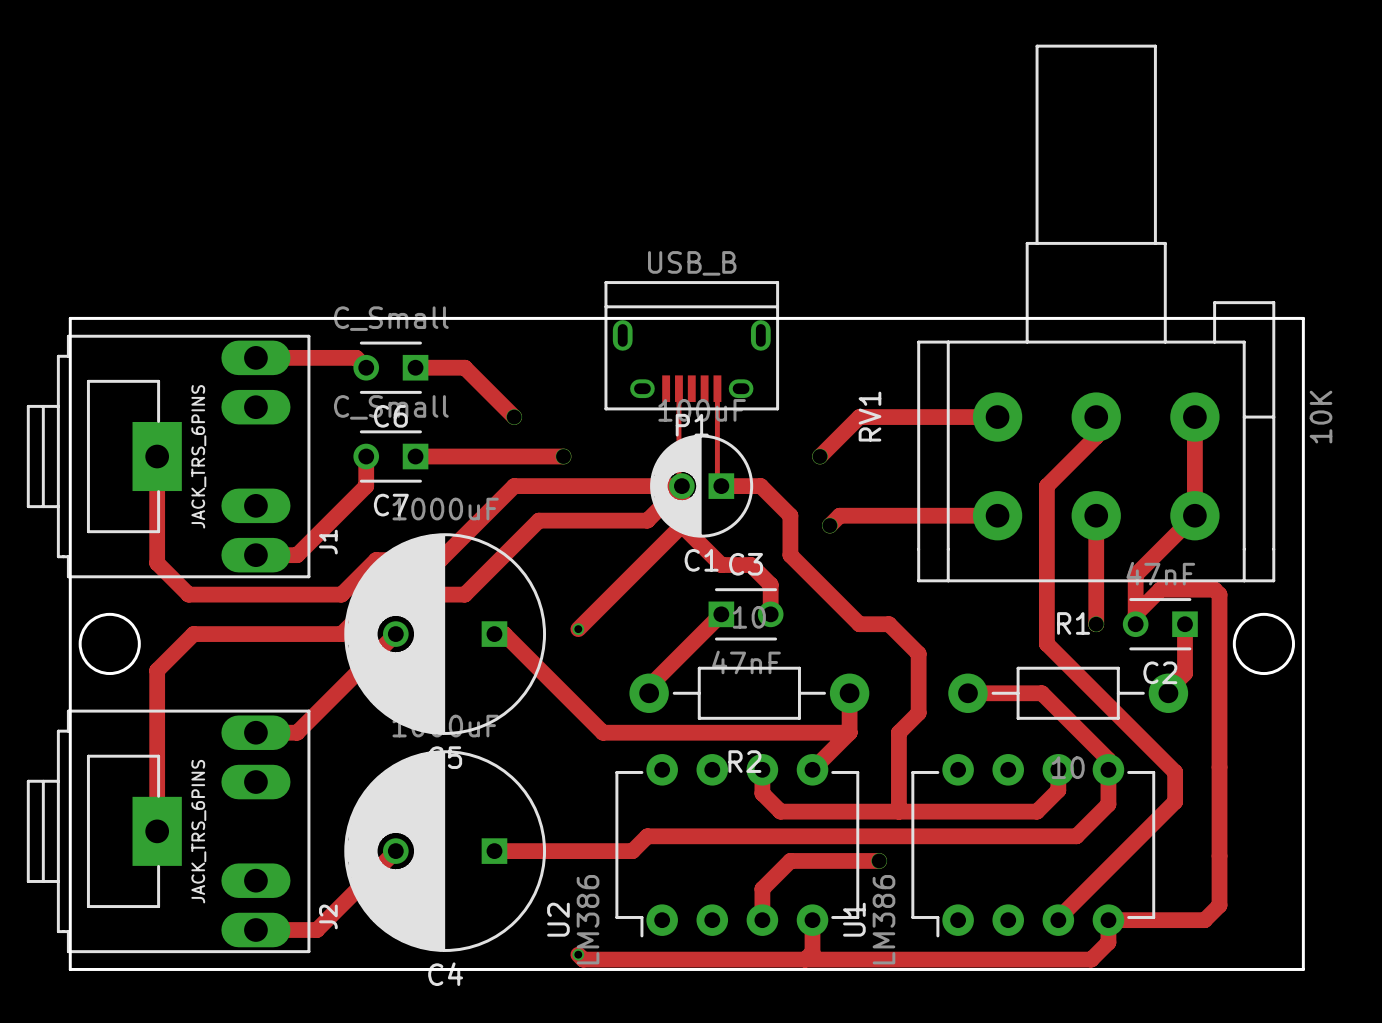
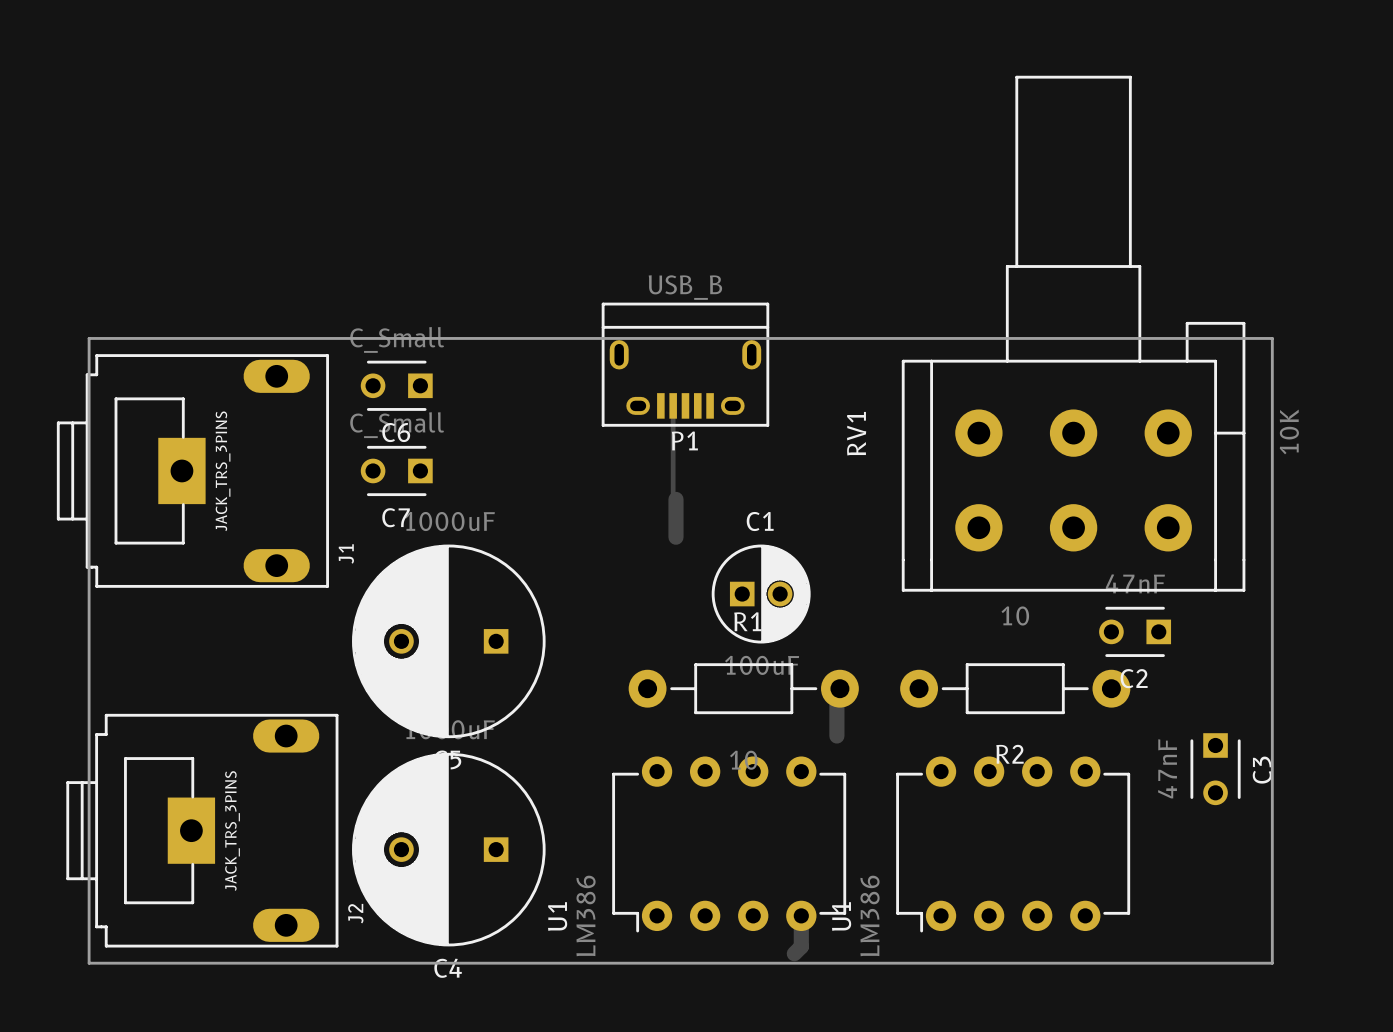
J1 footprint: [26, 334, 311, 579] -> [56, 354, 329, 588]
track: (255, 357) (356, 357) (366, 367) -> none
track: (415, 367) (464, 367) (514, 417) -> none
track: (717, 388) (717, 482) (721, 486) (760, 486) (790, 515) (790, 555) (859, 624) (889, 624) (918, 653) (918, 712) (898, 732) (898, 811) -> none
via: (514, 417) -> none
track: (997, 417) (859, 417) (820, 456) -> none
track: (1096, 417) (1096, 436) (1046, 486) (1046, 643) (1175, 772) (1175, 801) (1058, 920) -> none
track: (1194, 417) (1194, 515) (1135, 574) (1135, 624) -> none
track: (157, 456) (157, 563) (188, 594) (341, 594) (376, 560) (440, 560) (514, 486) (681, 486) (647, 520) (538, 520) (464, 594) (381, 594) (341, 634) (193, 634) (157, 670) (157, 831) -> none
J1 value: JACK_TRS_6PINS (198, 456) -> JACK_TRS_3PINS (223, 471)
track: (366, 456) (366, 486) (297, 555) (255, 555) -> none
track: (415, 456) (563, 456) -> none
via: (563, 456) -> none
via: (820, 456) -> none
C1 rotation: 0° (701, 486) -> 180° (761, 594)
C1 position: (701, 486) -> (761, 594)
track: (997, 515) (839, 515) (829, 525) -> none
track: (1096, 515) (1096, 624) -> none
via: (829, 525) -> none
round board edge: [78, 612, 141, 676] -> none
round board edge: [1232, 612, 1295, 676] -> none
track: (721, 614) (649, 686) (649, 693) -> none
C3 rotation: 0° (746, 614) -> 90° clockwise (1215, 769)
C3 position: (746, 614) -> (1215, 769)
track: (770, 614) (770, 584) (750, 565) (721, 565) (681, 525) (578, 629) -> none
track: (1135, 614) (1160, 589) (1214, 589) (1219, 594) (1219, 905) (1204, 920) (1108, 920) (1108, 942) (1091, 959) (583, 959) (578, 954) -> none
via: (1096, 624) -> none
track: (1184, 624) (1184, 673) (1168, 690) (1168, 693) -> none
via: (578, 629) -> none
track: (395, 634) (297, 732) (255, 732) -> none
track: (494, 634) (504, 634) (602, 732) (849, 732) (812, 769) -> none
R2 position: (749, 693) -> (1015, 688)
track: (967, 693) (1041, 693) (1108, 759) (1108, 804) (1076, 836) (647, 836) (632, 851) (494, 851) -> none
R1 position: (1068, 693) -> (743, 688)
J2 footprint: [26, 709, 311, 954] -> [66, 713, 339, 948]
track: (762, 769) (762, 793) (780, 811) (1037, 811) (1058, 790) (1058, 769) -> none
J2 value: JACK_TRS_6PINS (198, 831) -> JACK_TRS_3PINS (232, 831)
track: (395, 851) (316, 930) (255, 930) -> none
track: (879, 860) (790, 860) (762, 888) (762, 920) -> none
via: (879, 860) -> none
U2 name: U2 (558, 919) -> U1 (557, 916)
via: (578, 954) -> none

